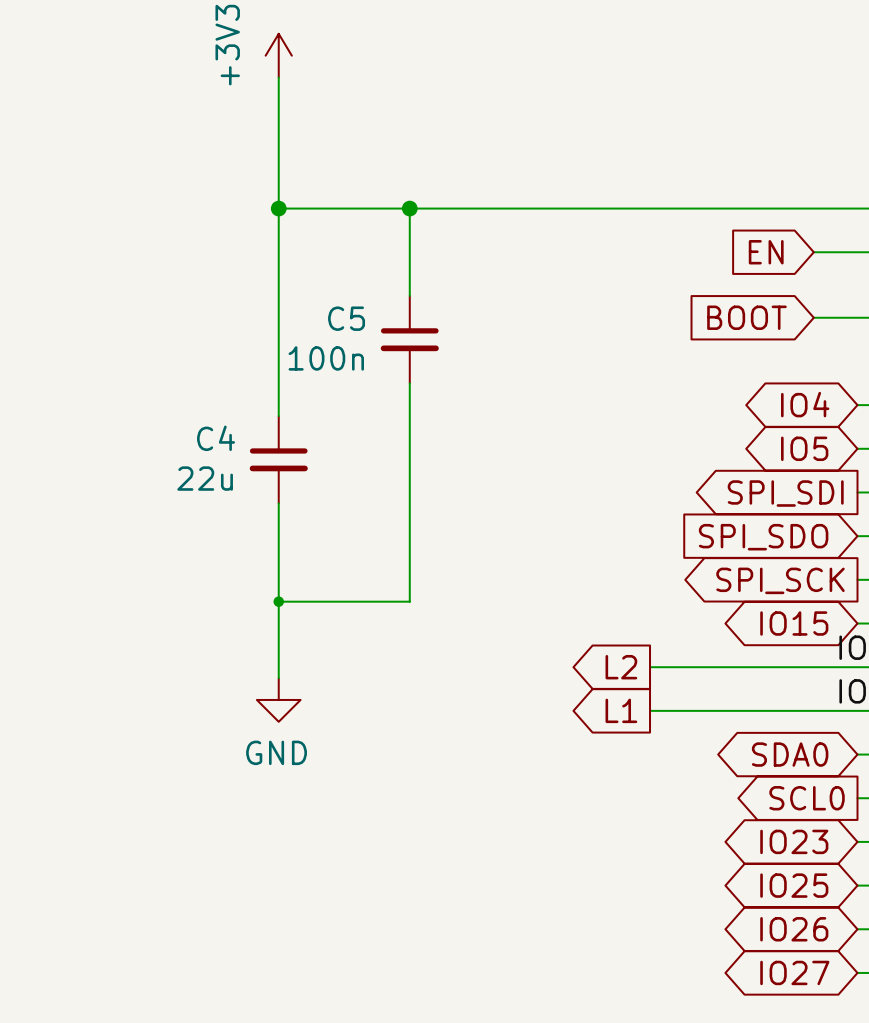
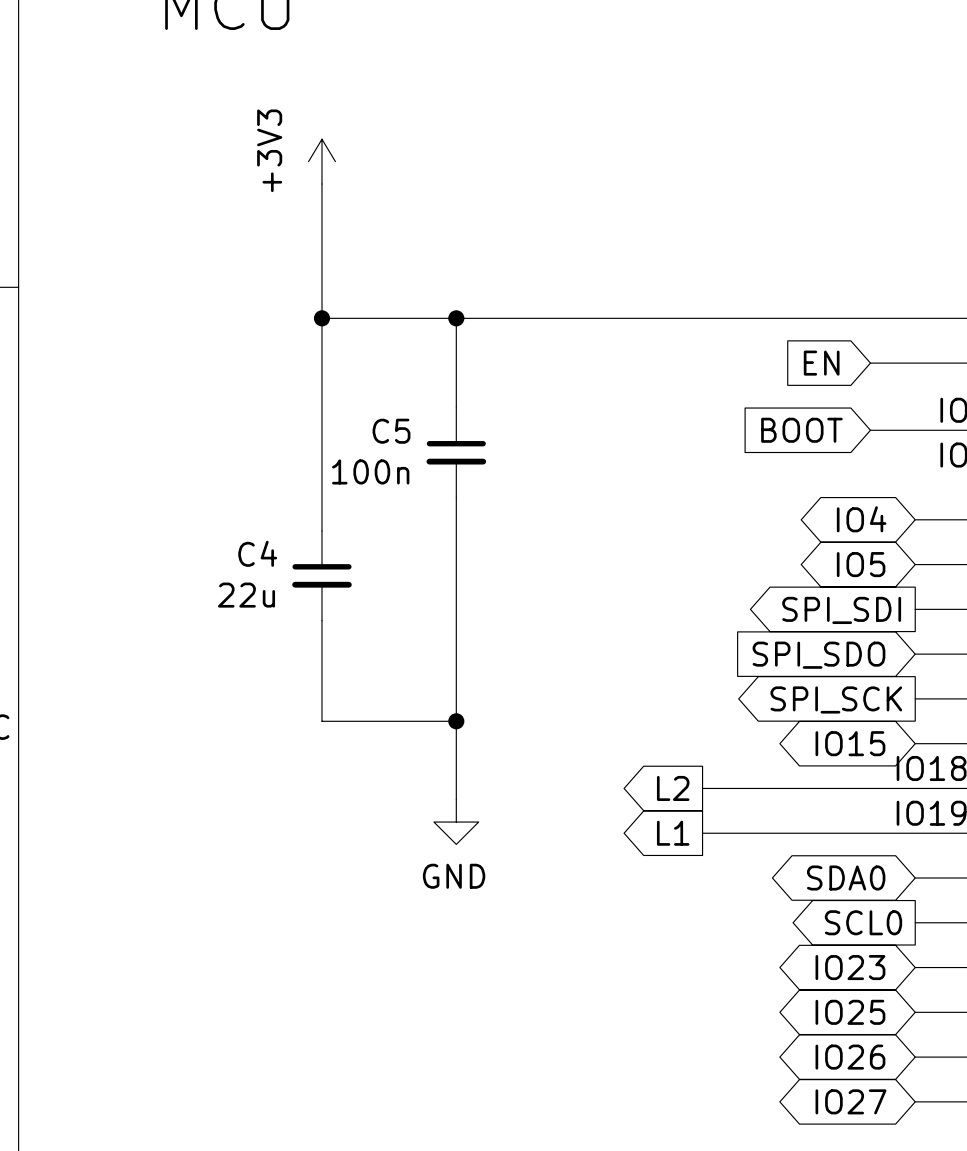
wire: (278, 601) (278, 678) -> (456, 721) (456, 799)
junction: (278, 601) -> none
junction: none -> (456, 721)
power symbol position: GND (278, 699) -> GND (456, 822)

